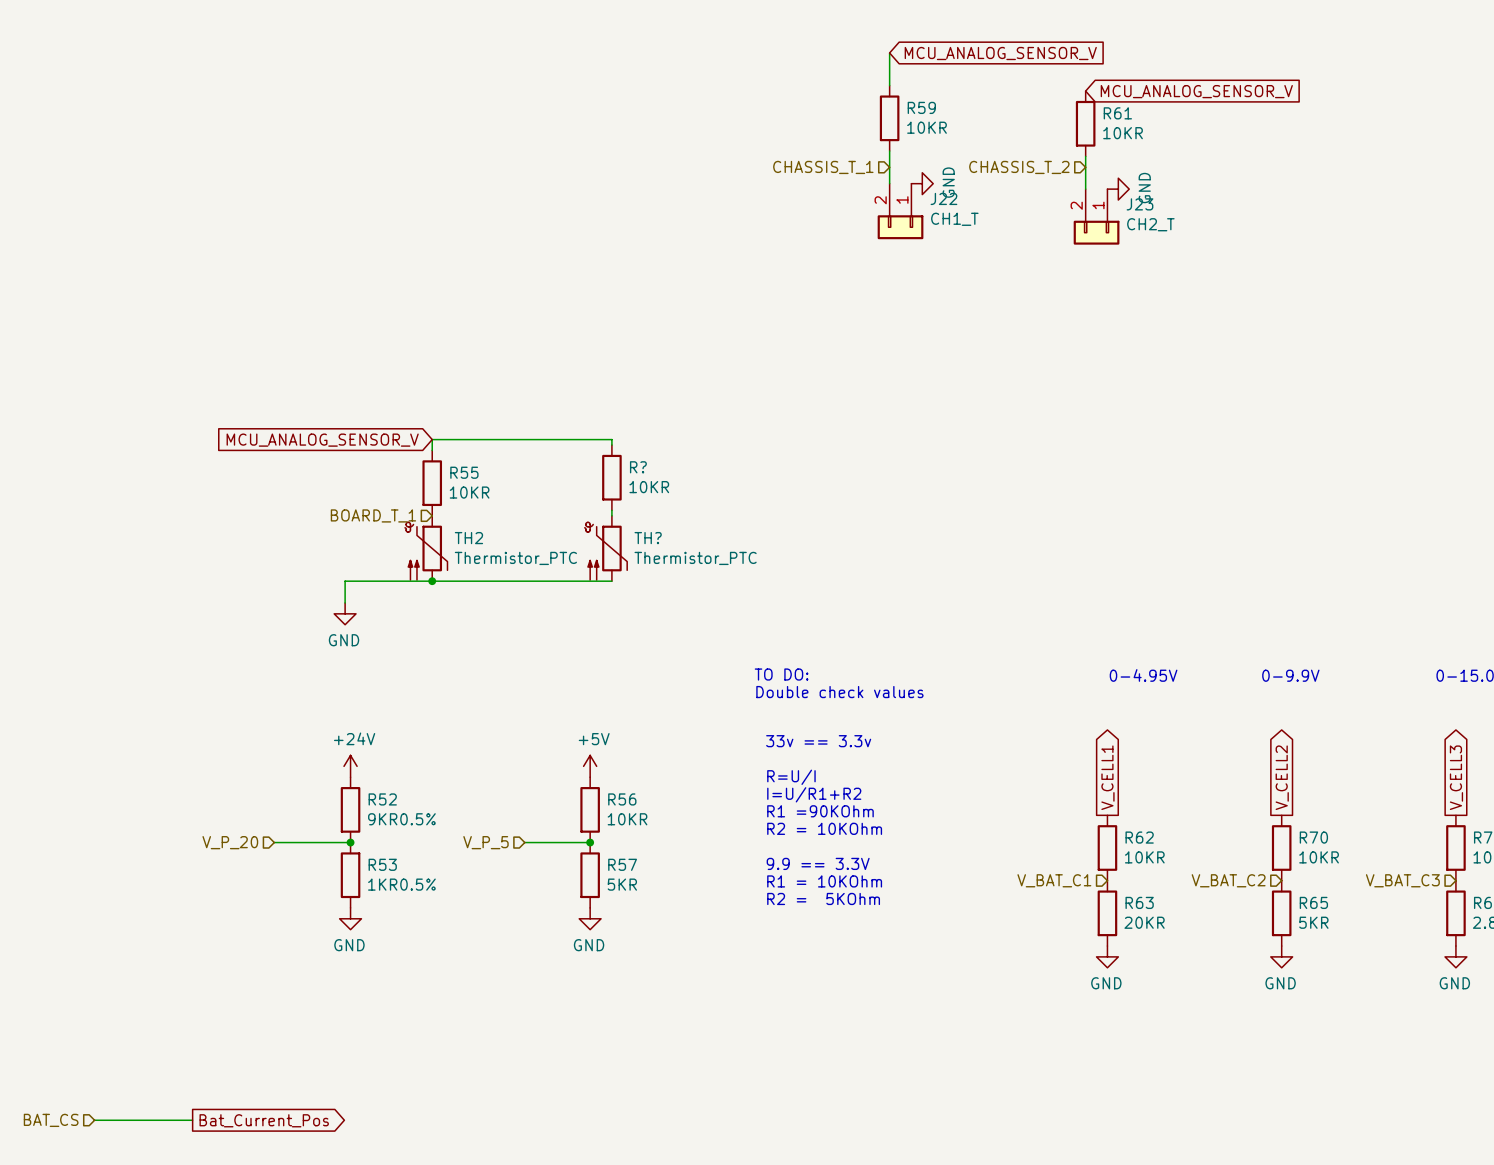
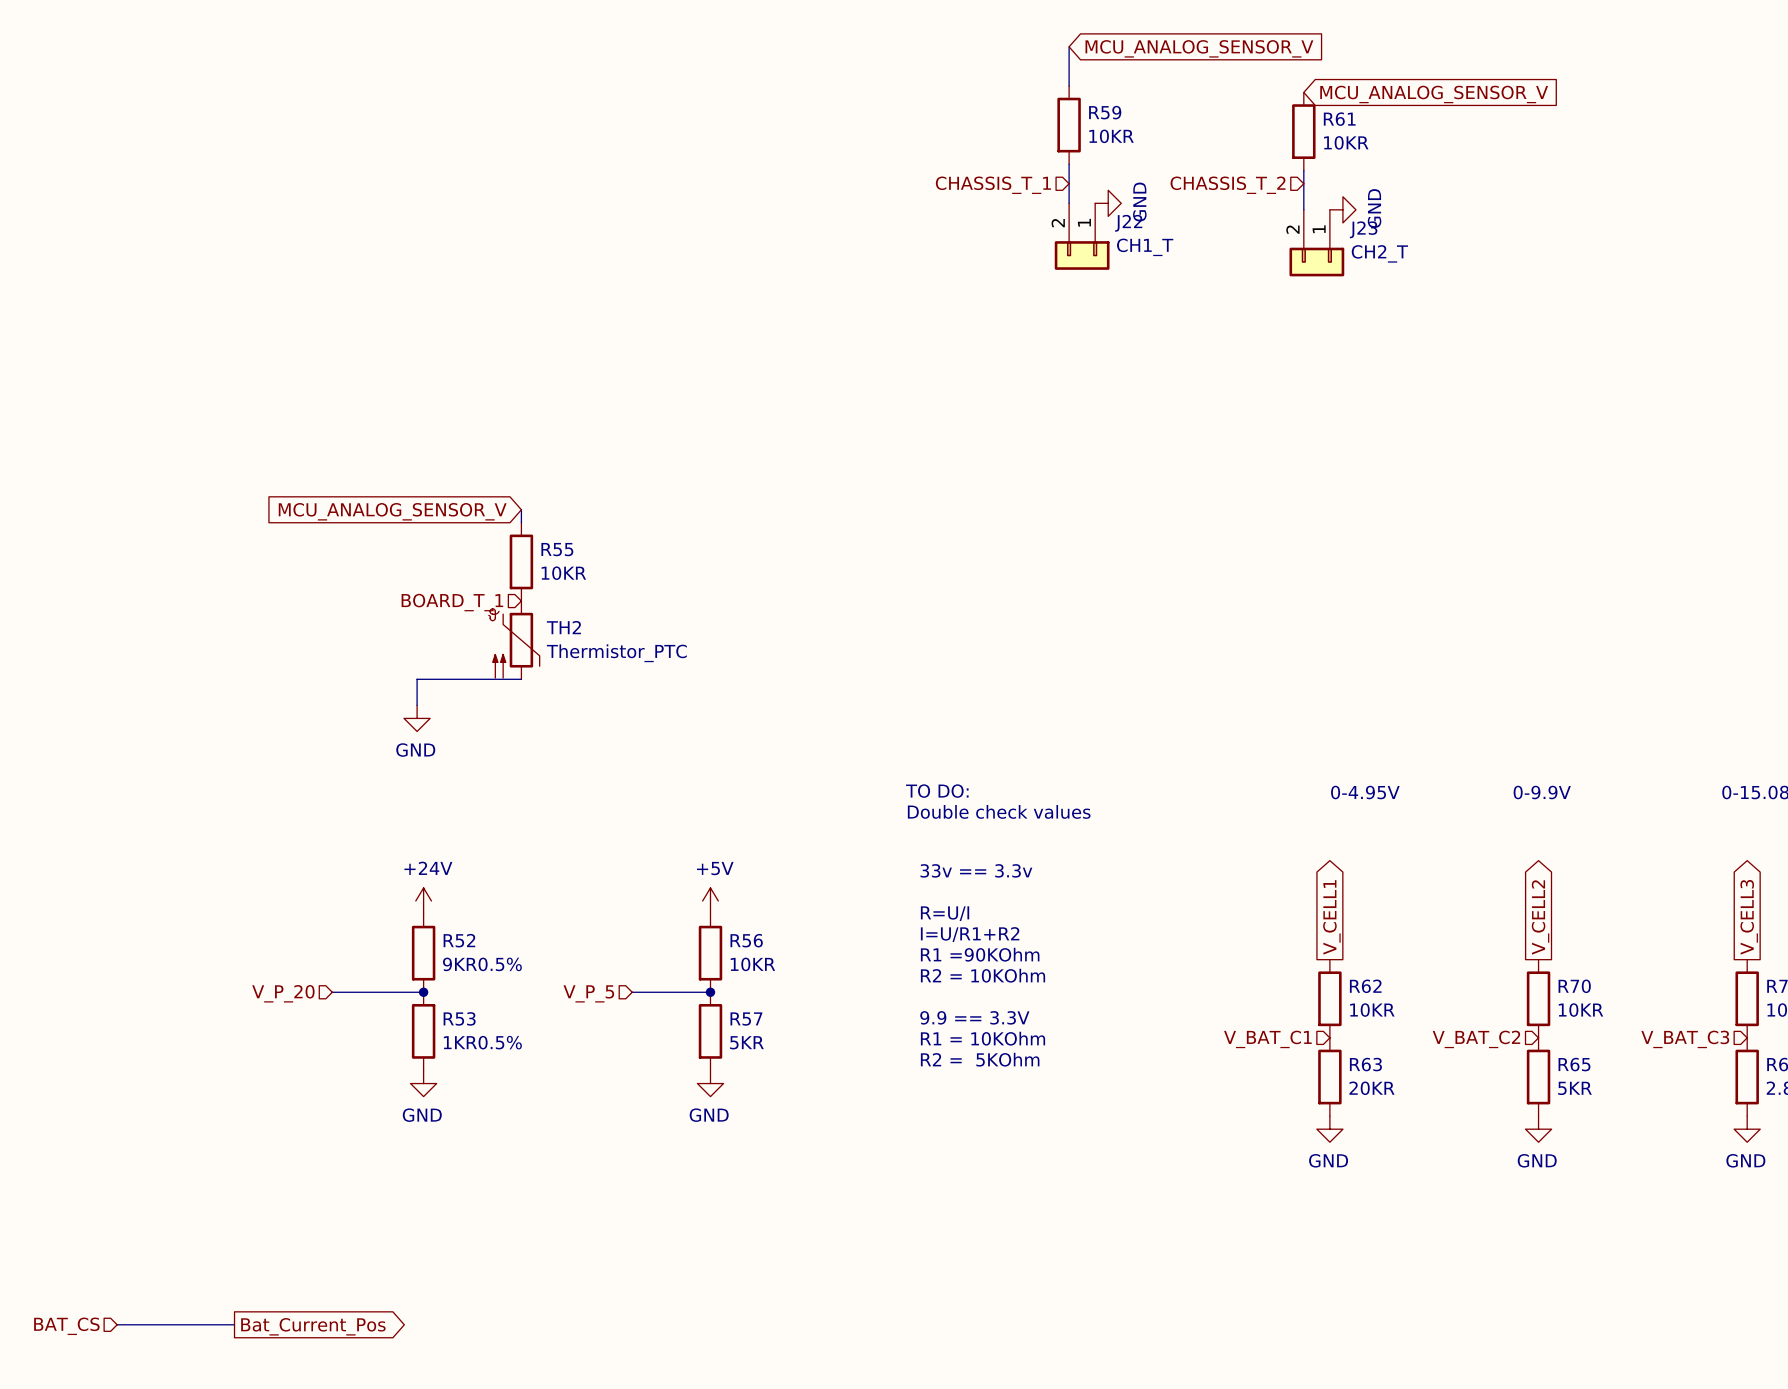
wire: (432, 439) (611, 439) (611, 445) -> none
R?: 10KR (611, 477) -> none
wire: (611, 510) (611, 515) -> none
TH?: Thermistor_PTC (605, 548) -> none
wire: (432, 581) (611, 581) -> none
junction: (432, 581) -> none

